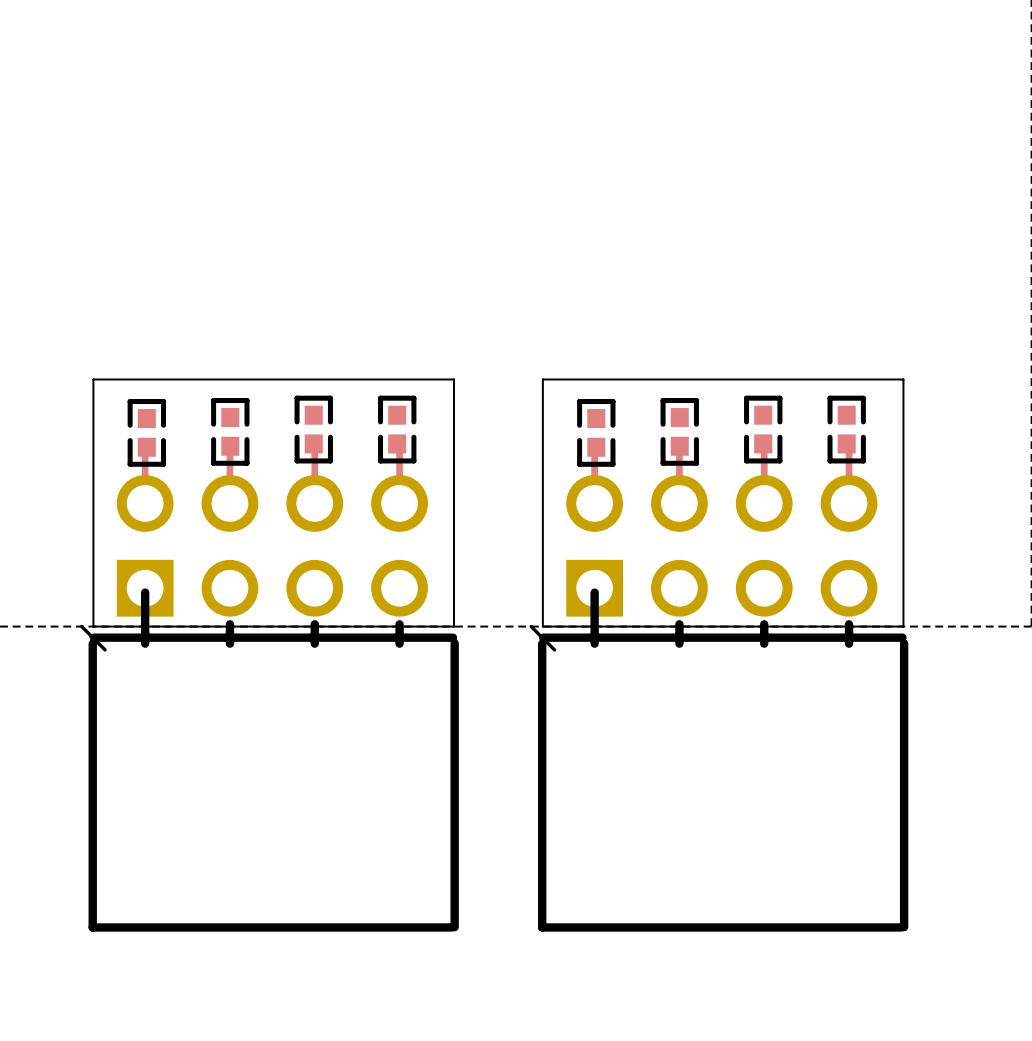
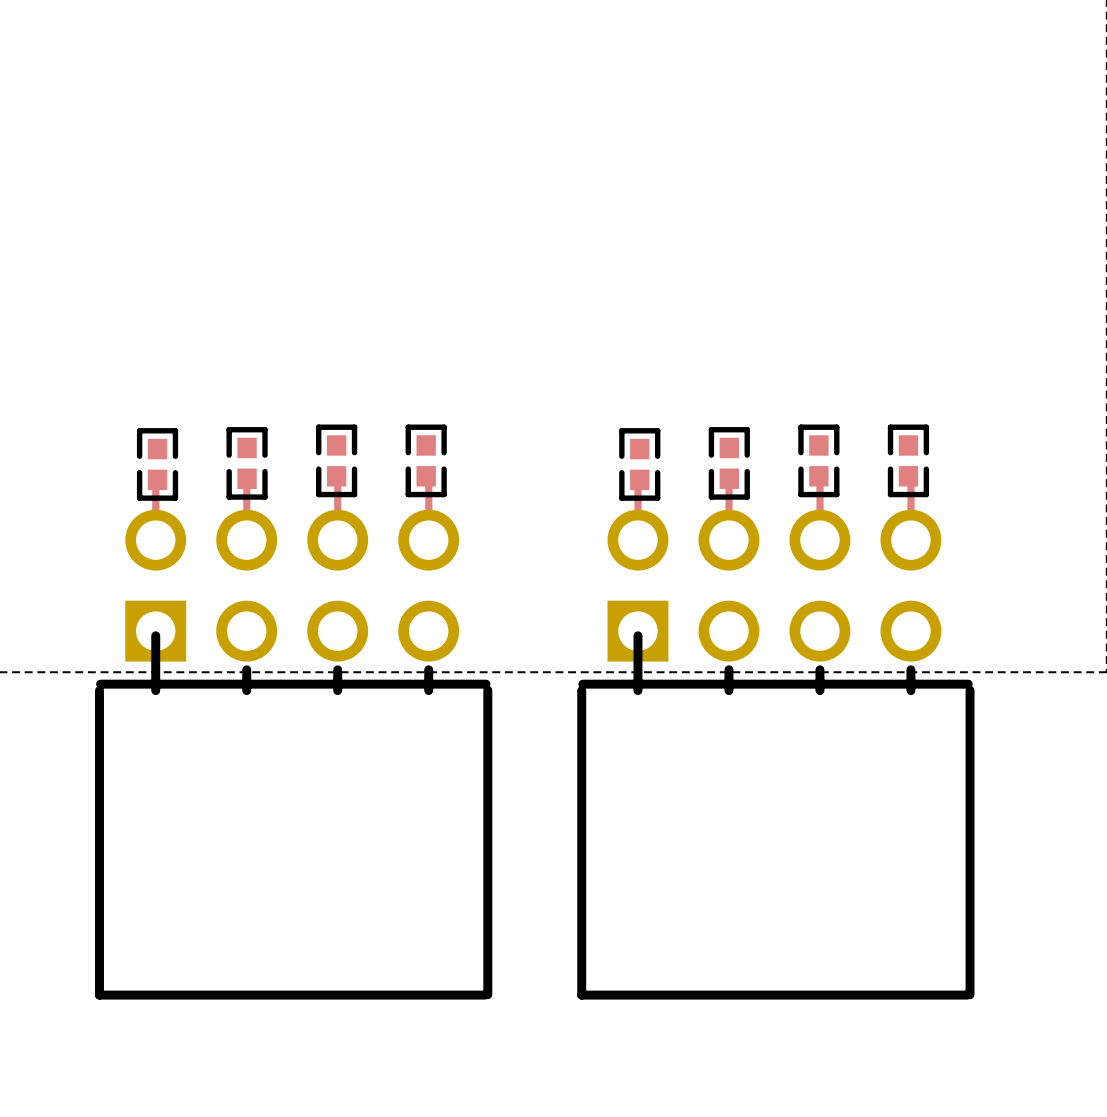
board edge: (93, 379) (453, 379) (453, 626) (93, 626) (93, 379) -> none
board edge: (542, 379) (903, 379) (903, 626) (542, 626) (542, 379) -> none
board edge: (81, 626) (105, 649) -> none
board edge: (531, 626) (554, 649) -> none

